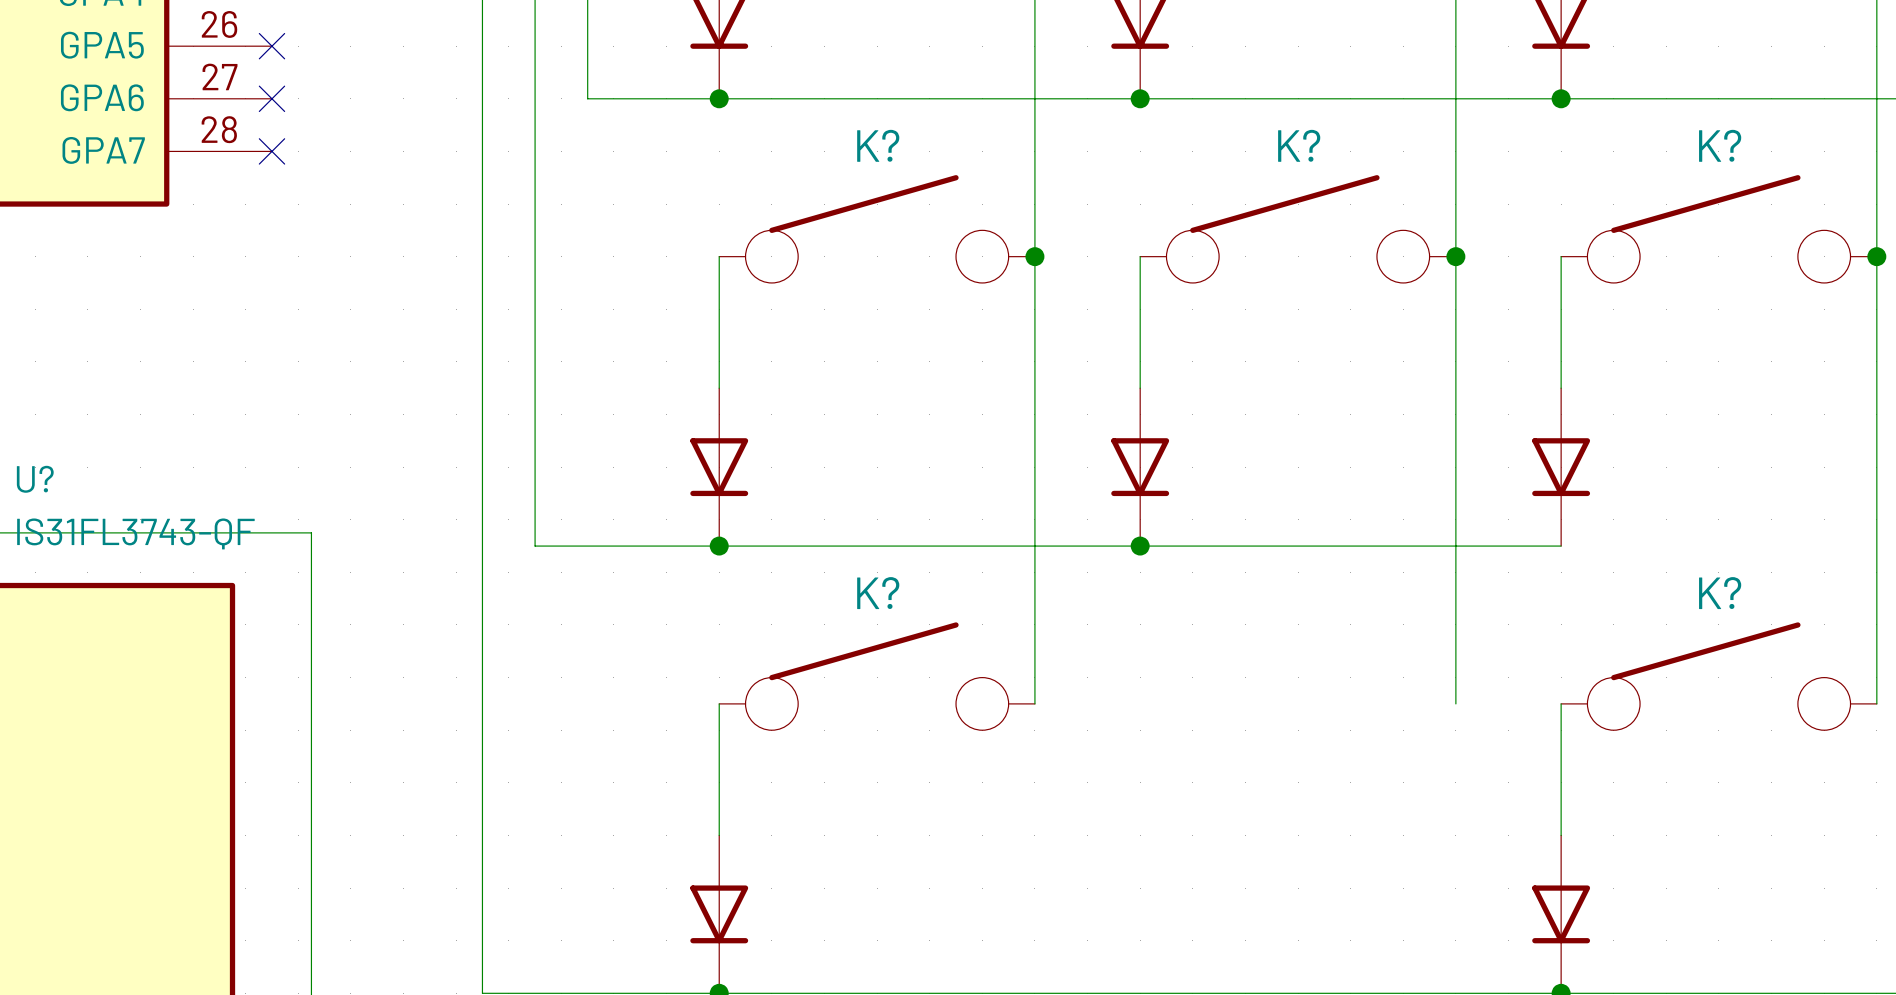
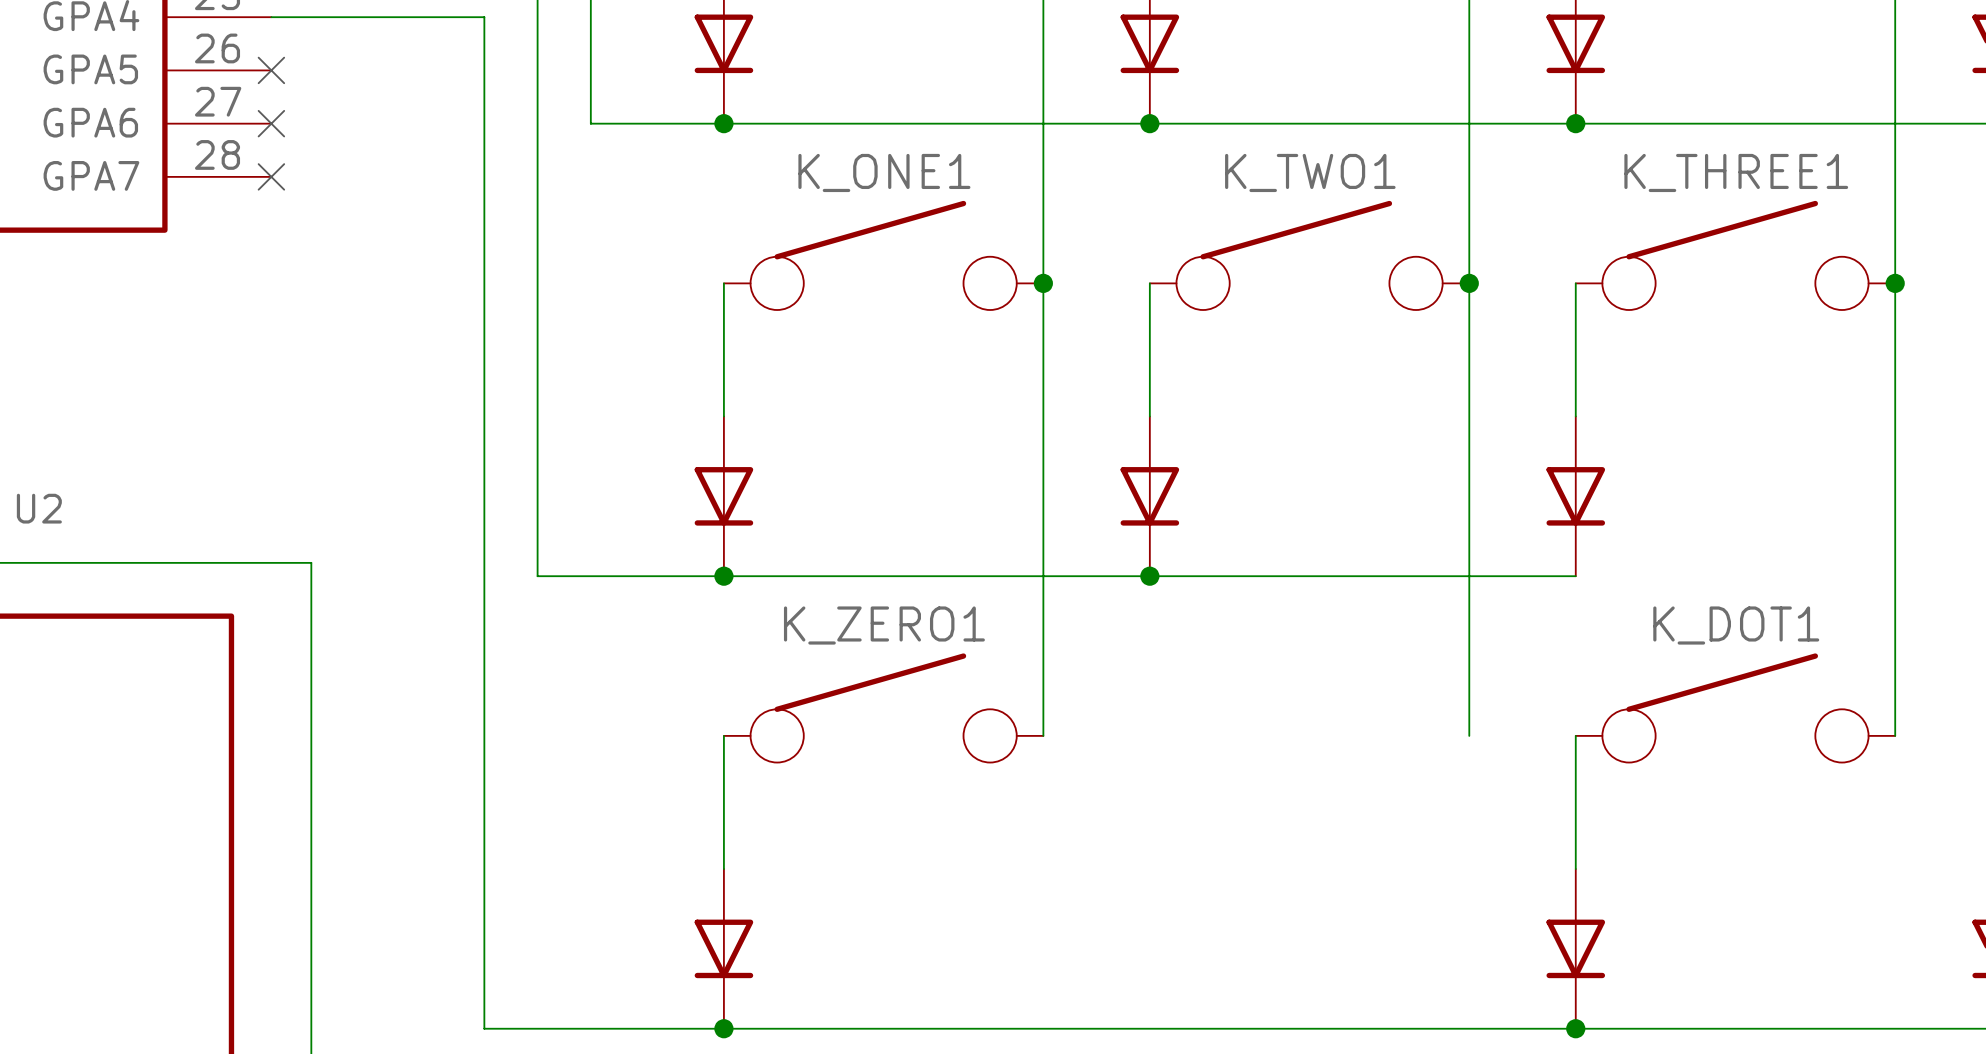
K? name: K? (878, 145) -> K_ONE1 (884, 172)
K? name: K? (1299, 145) -> K_TWO1 (1310, 172)
K? name: K? (1720, 145) -> K_THREE1 (1736, 172)
U? name: U? (35, 479) -> U2 (39, 508)
U? value: IS31FL3743-QF (135, 533) -> none
K? name: K? (878, 593) -> K_ZERO1 (884, 625)
K? name: K? (1720, 593) -> K_DOT1 (1736, 625)

